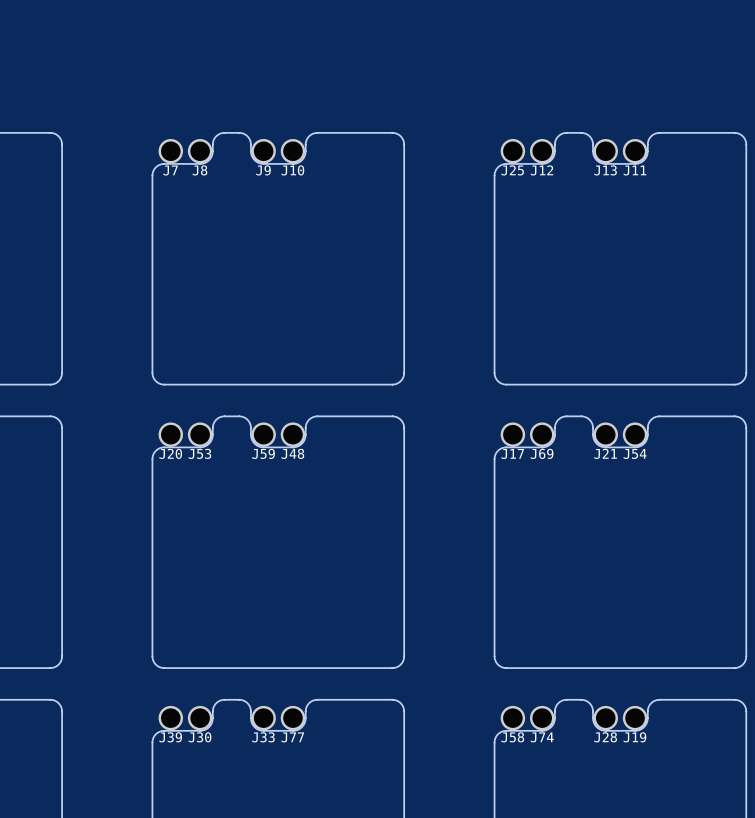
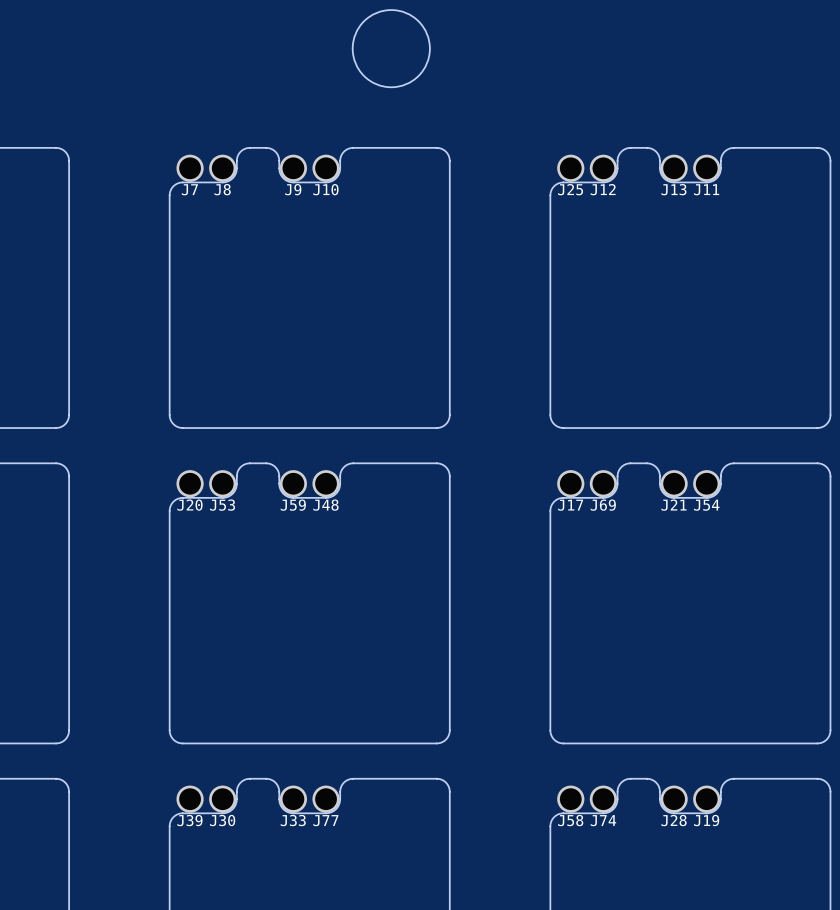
round board edge: none -> [352, 9, 431, 88]

